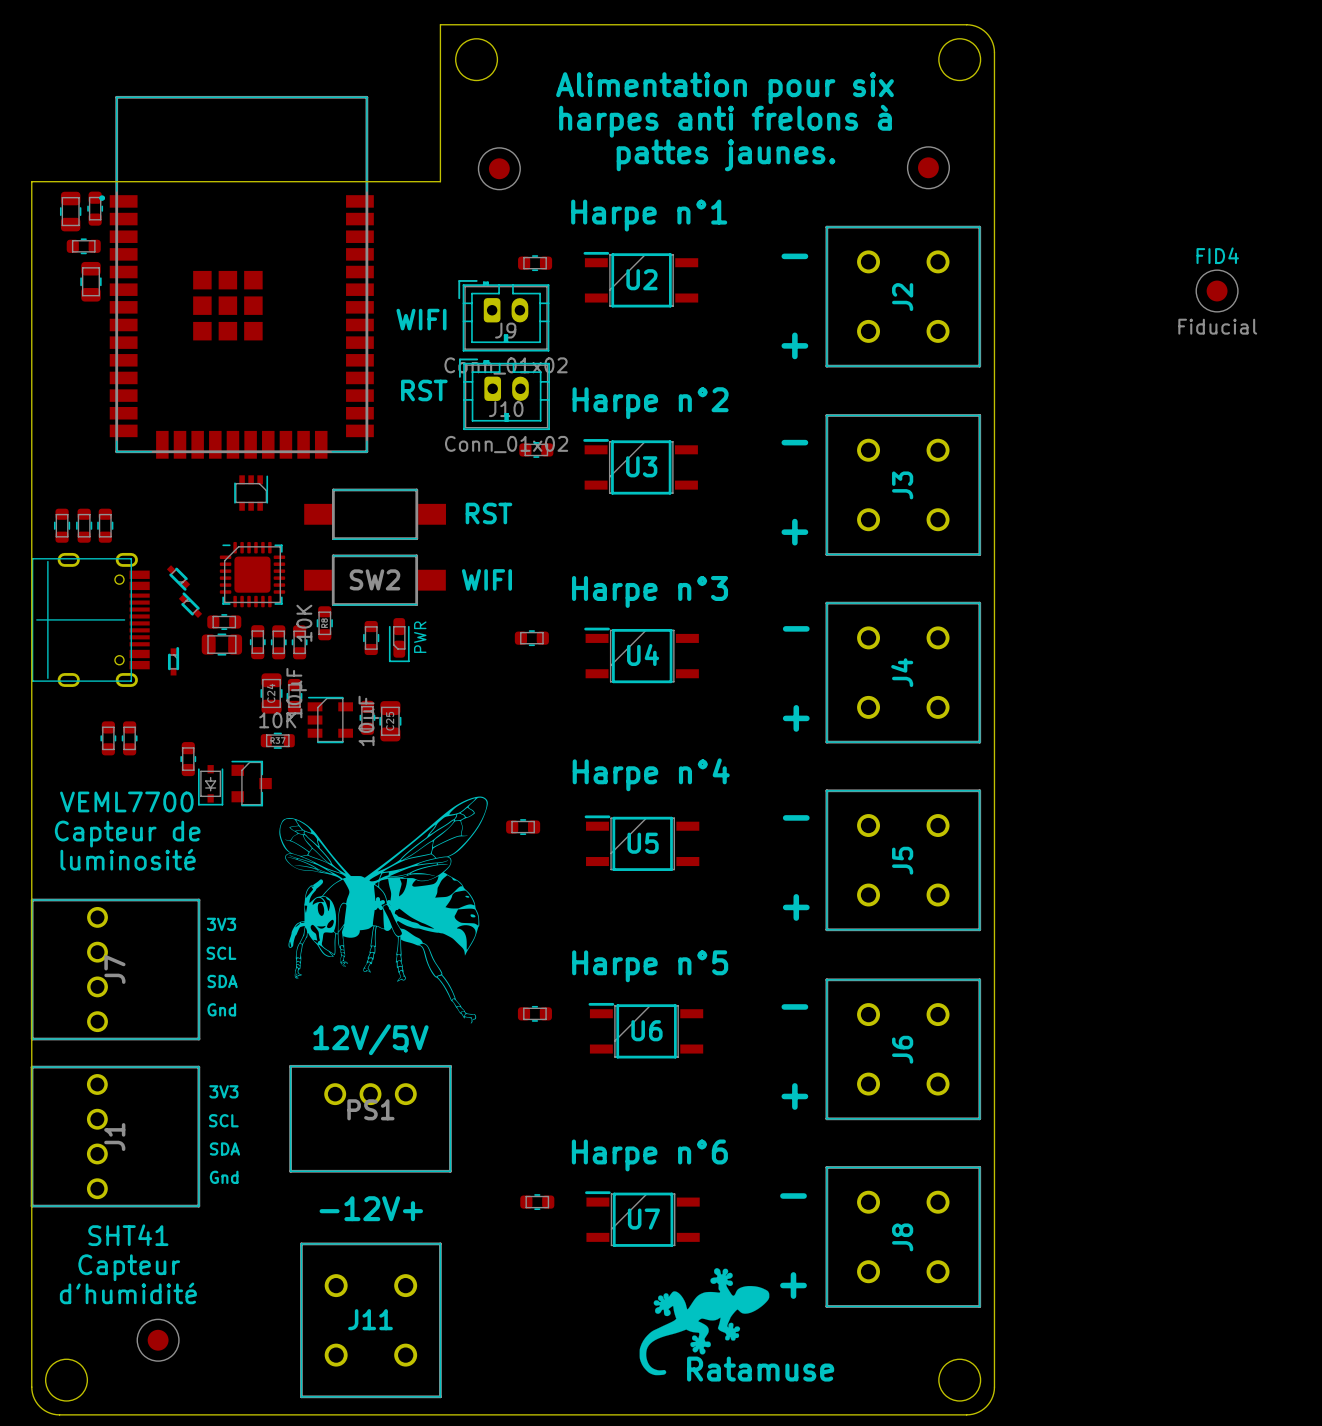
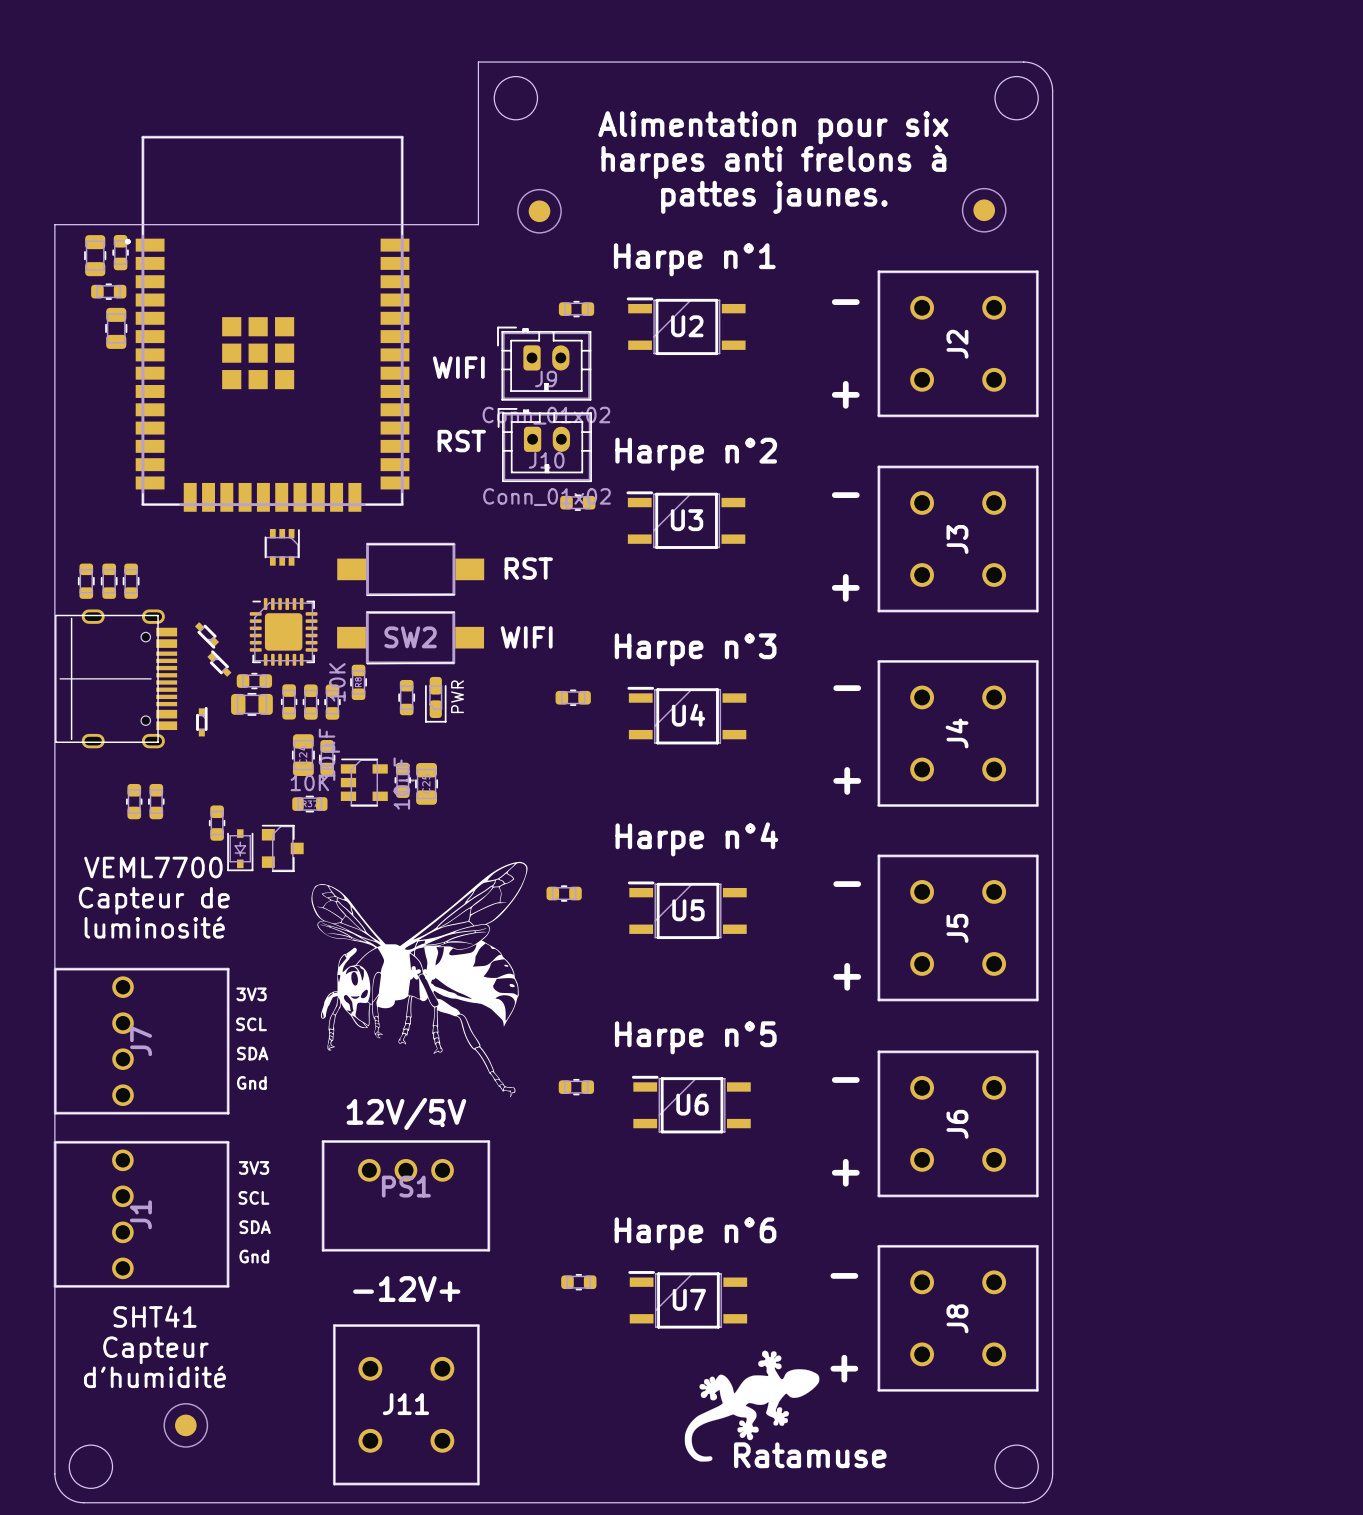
FID4: Fiducial (1217, 291) -> none

